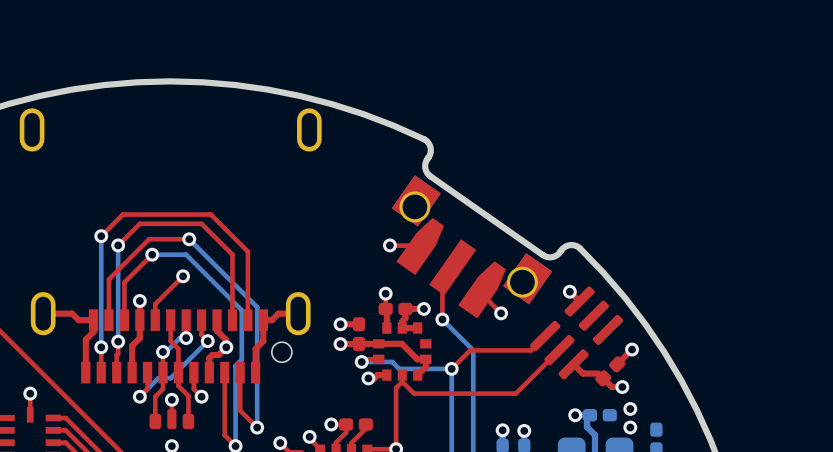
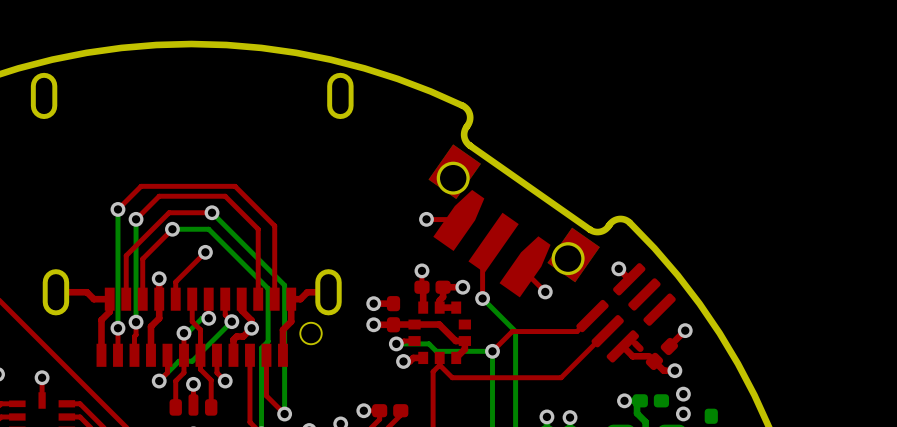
top track: none -> (635, 343) (640, 348)

